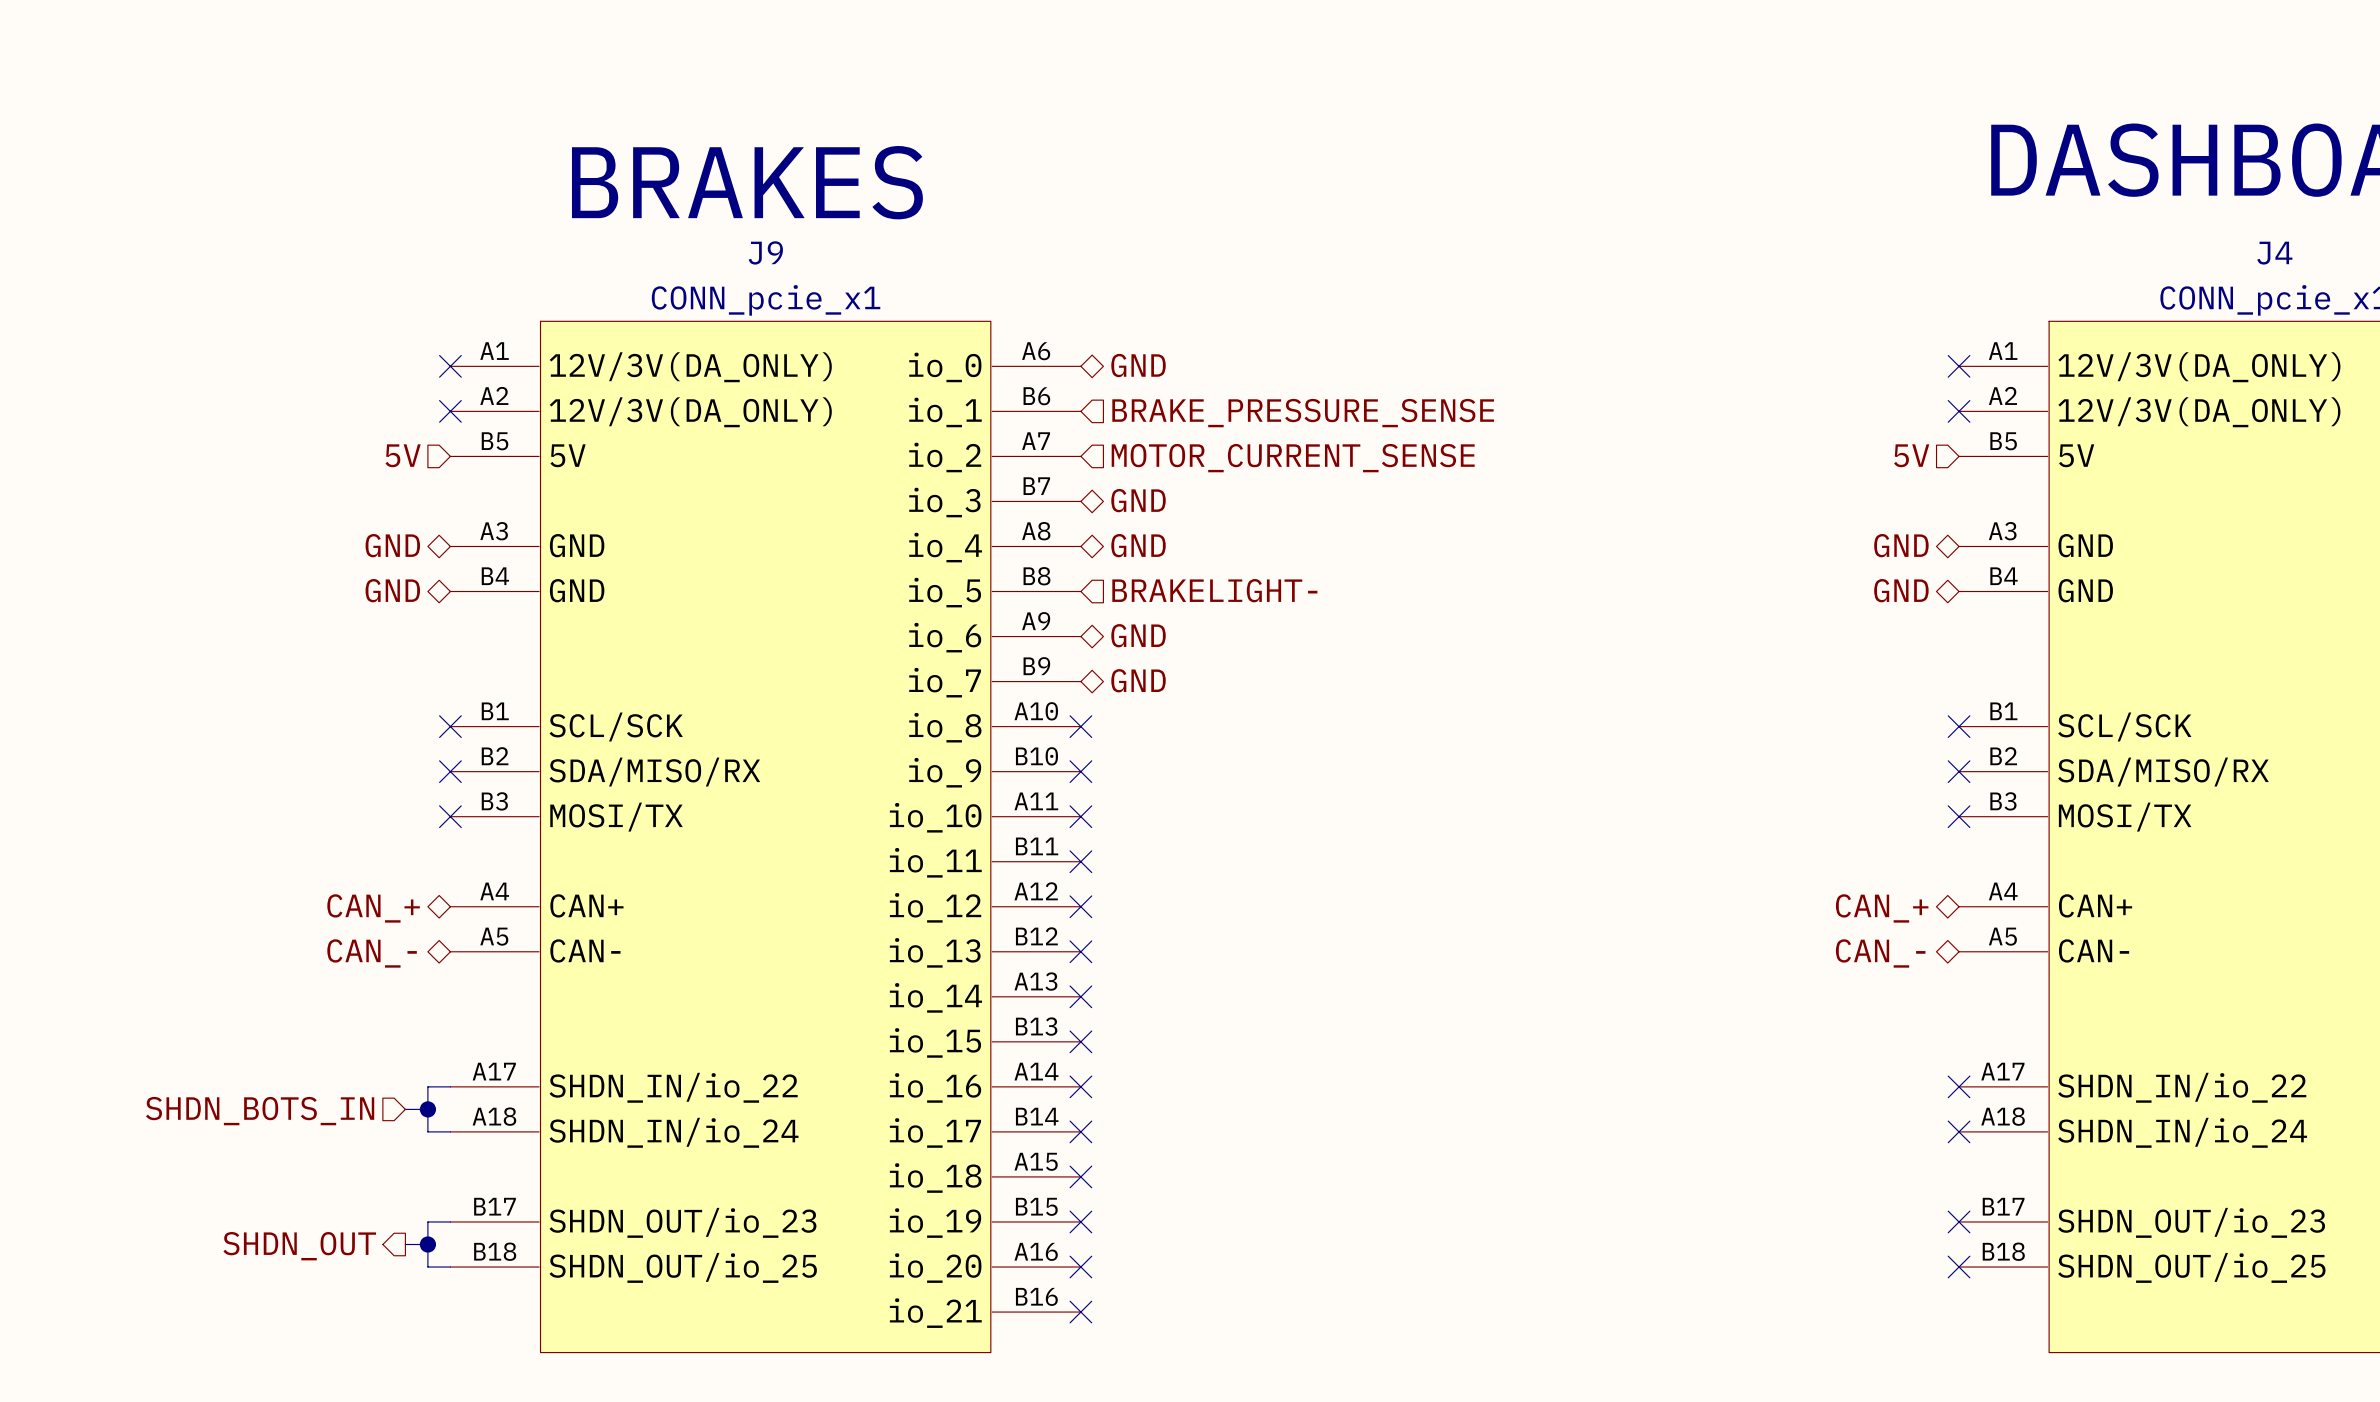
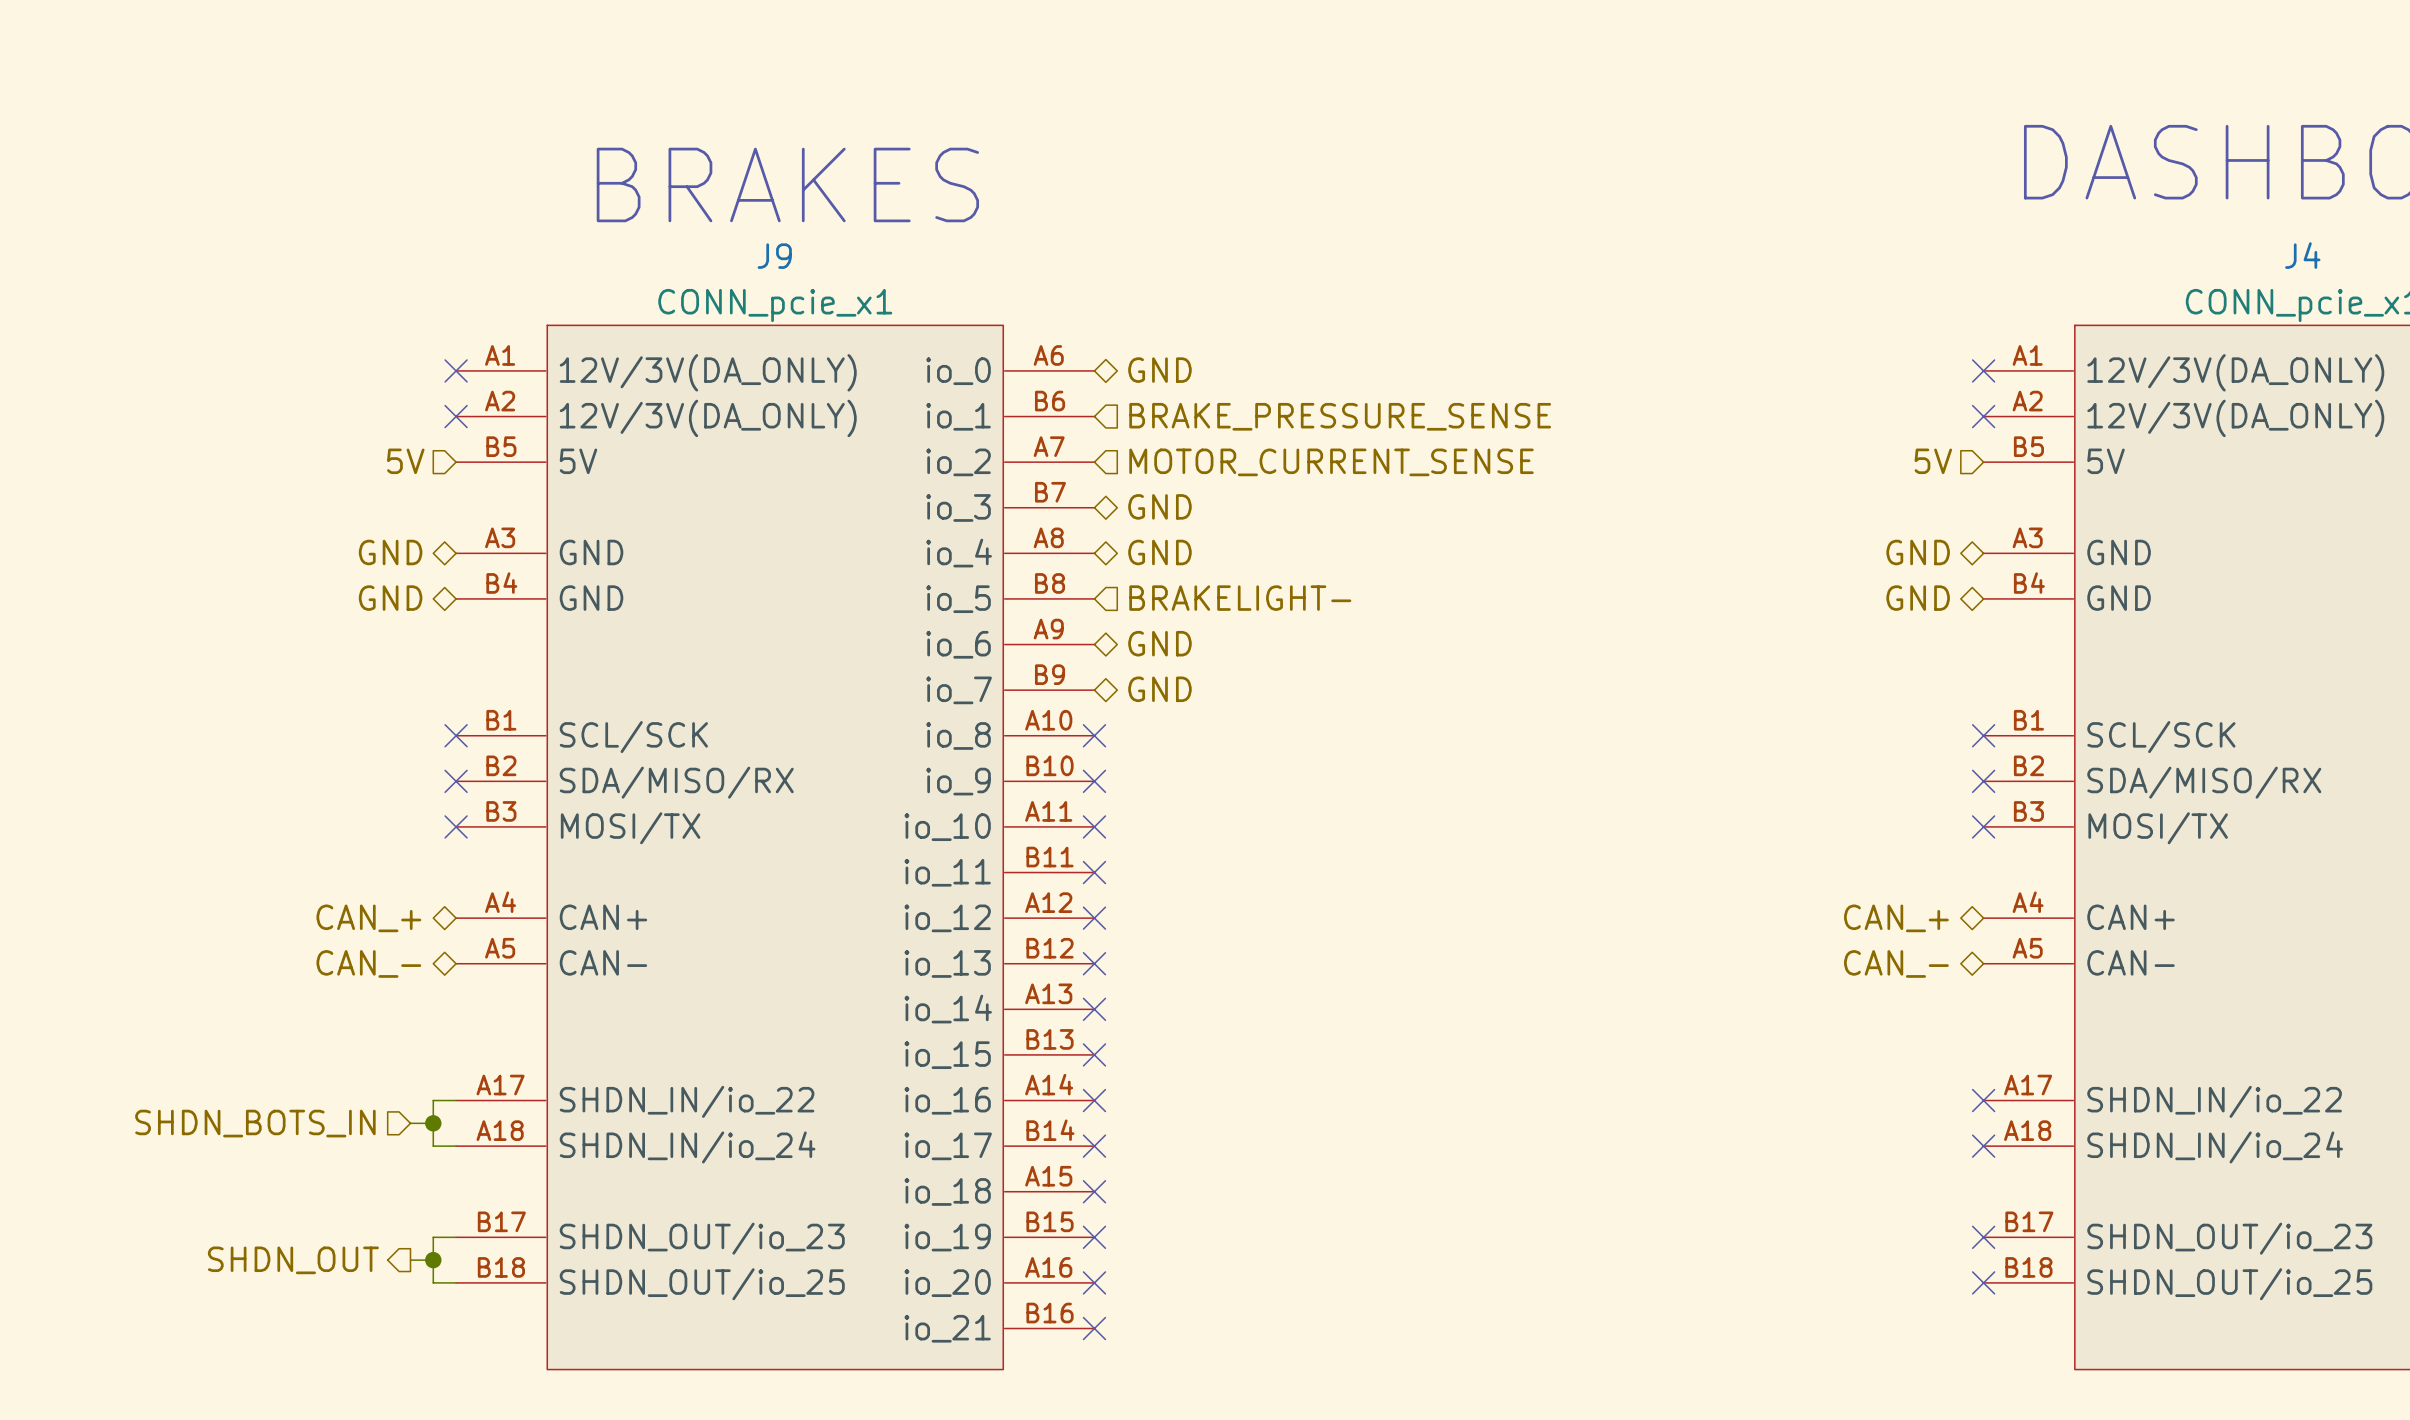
text position: BRAKES (747, 182) -> BRAKES (787, 184)

